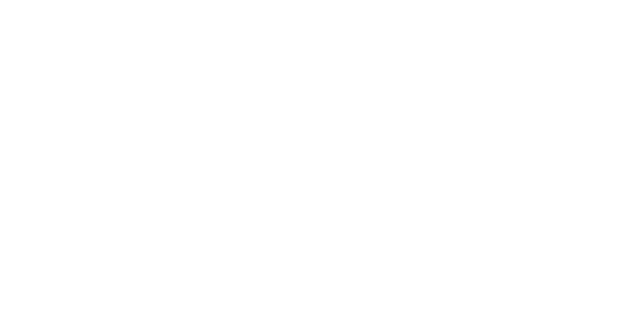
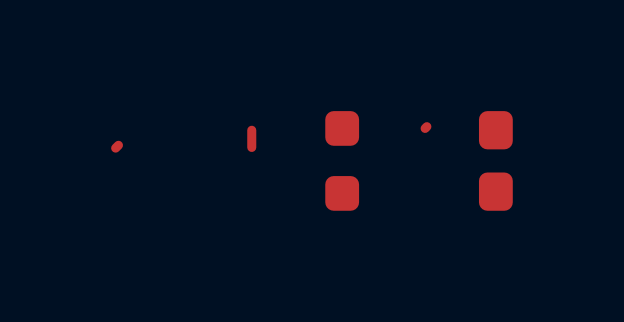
top track: none -> (426, 126) (425, 128)
top track: none -> (251, 130) (251, 147)
top track: none -> (118, 145) (115, 148)
part: none -> (342, 160)
part: none -> (495, 160)

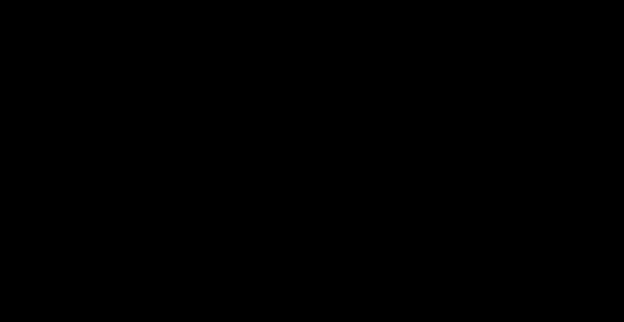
top track: (426, 126) (425, 128) -> none
top track: (251, 130) (251, 147) -> none
top track: (118, 145) (115, 148) -> none
part: (342, 160) -> none
part: (495, 160) -> none

